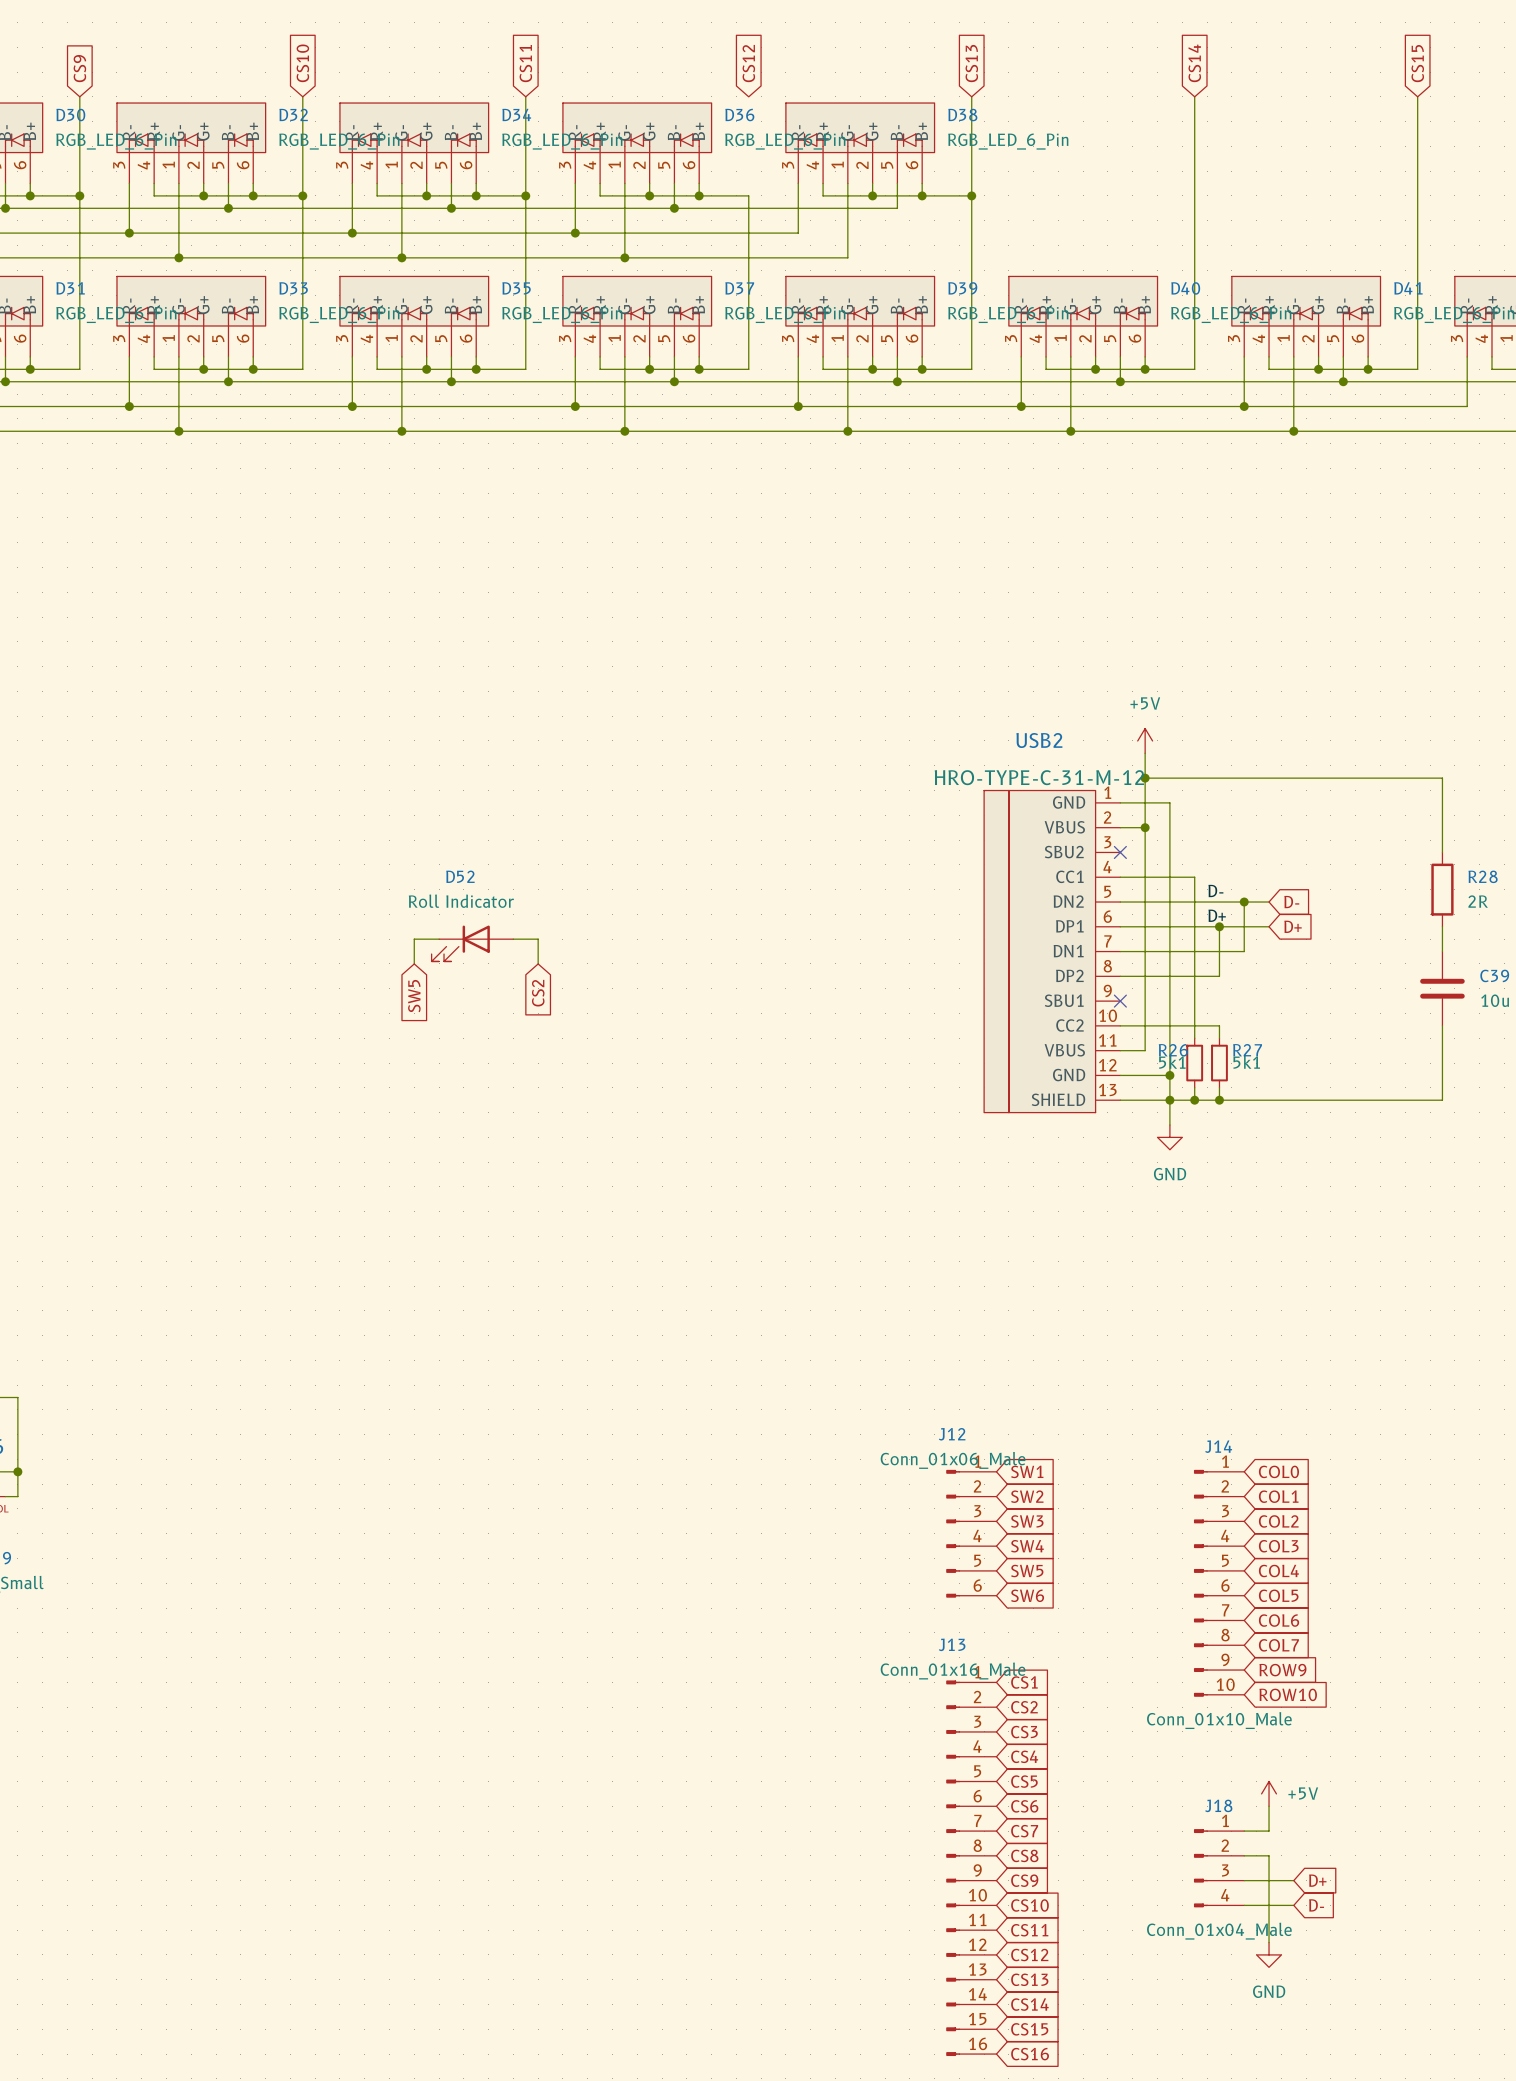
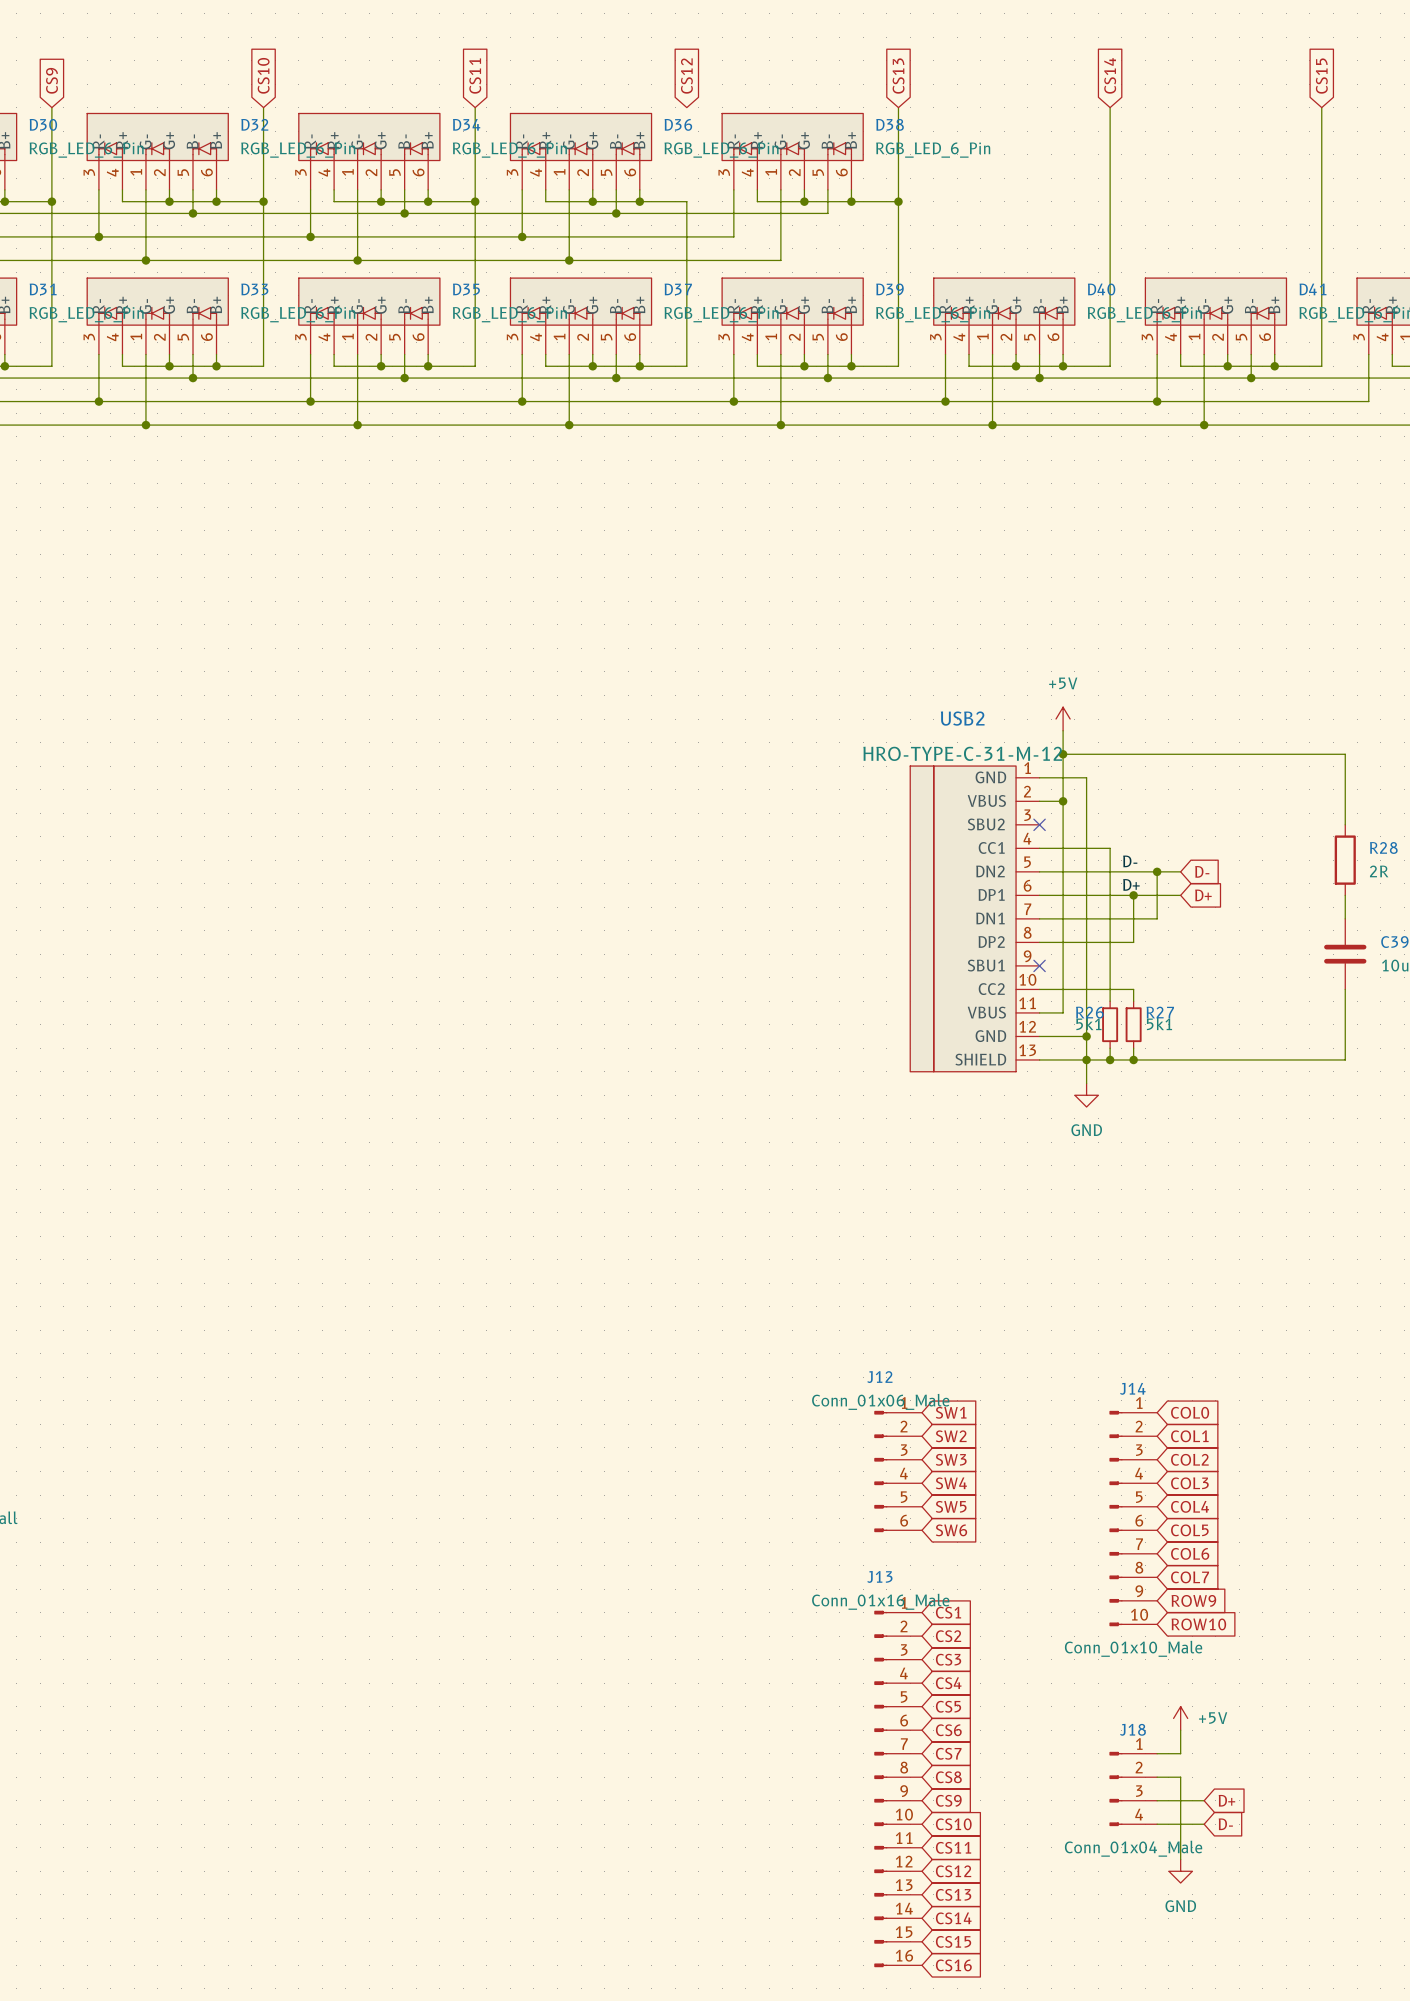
wire: (439, 939) (414, 939) (414, 963) -> none
wire: (513, 939) (538, 939) (538, 963) -> none
D52: Roll Indicator (472, 943) -> none
global label: CS2 (538, 993) -> none
global label: SW5 (414, 996) -> none

